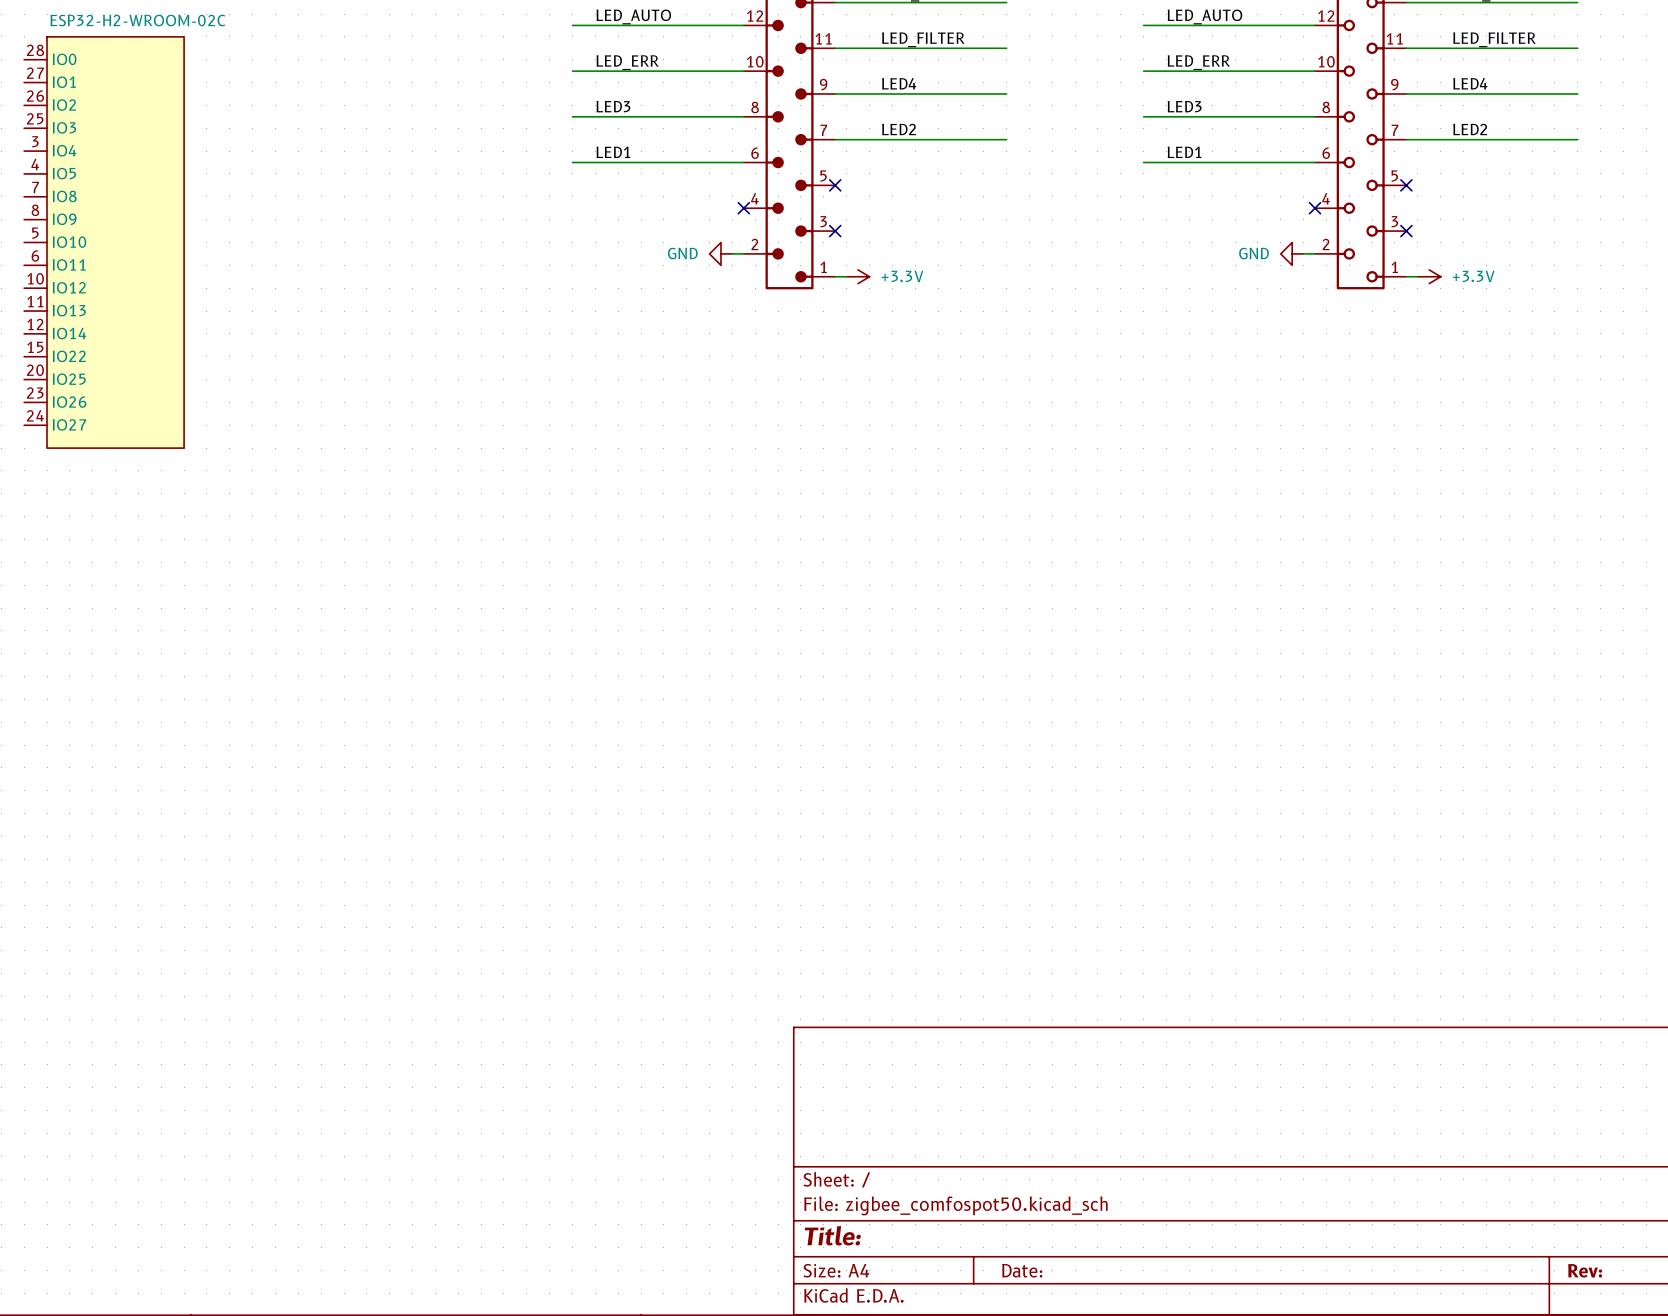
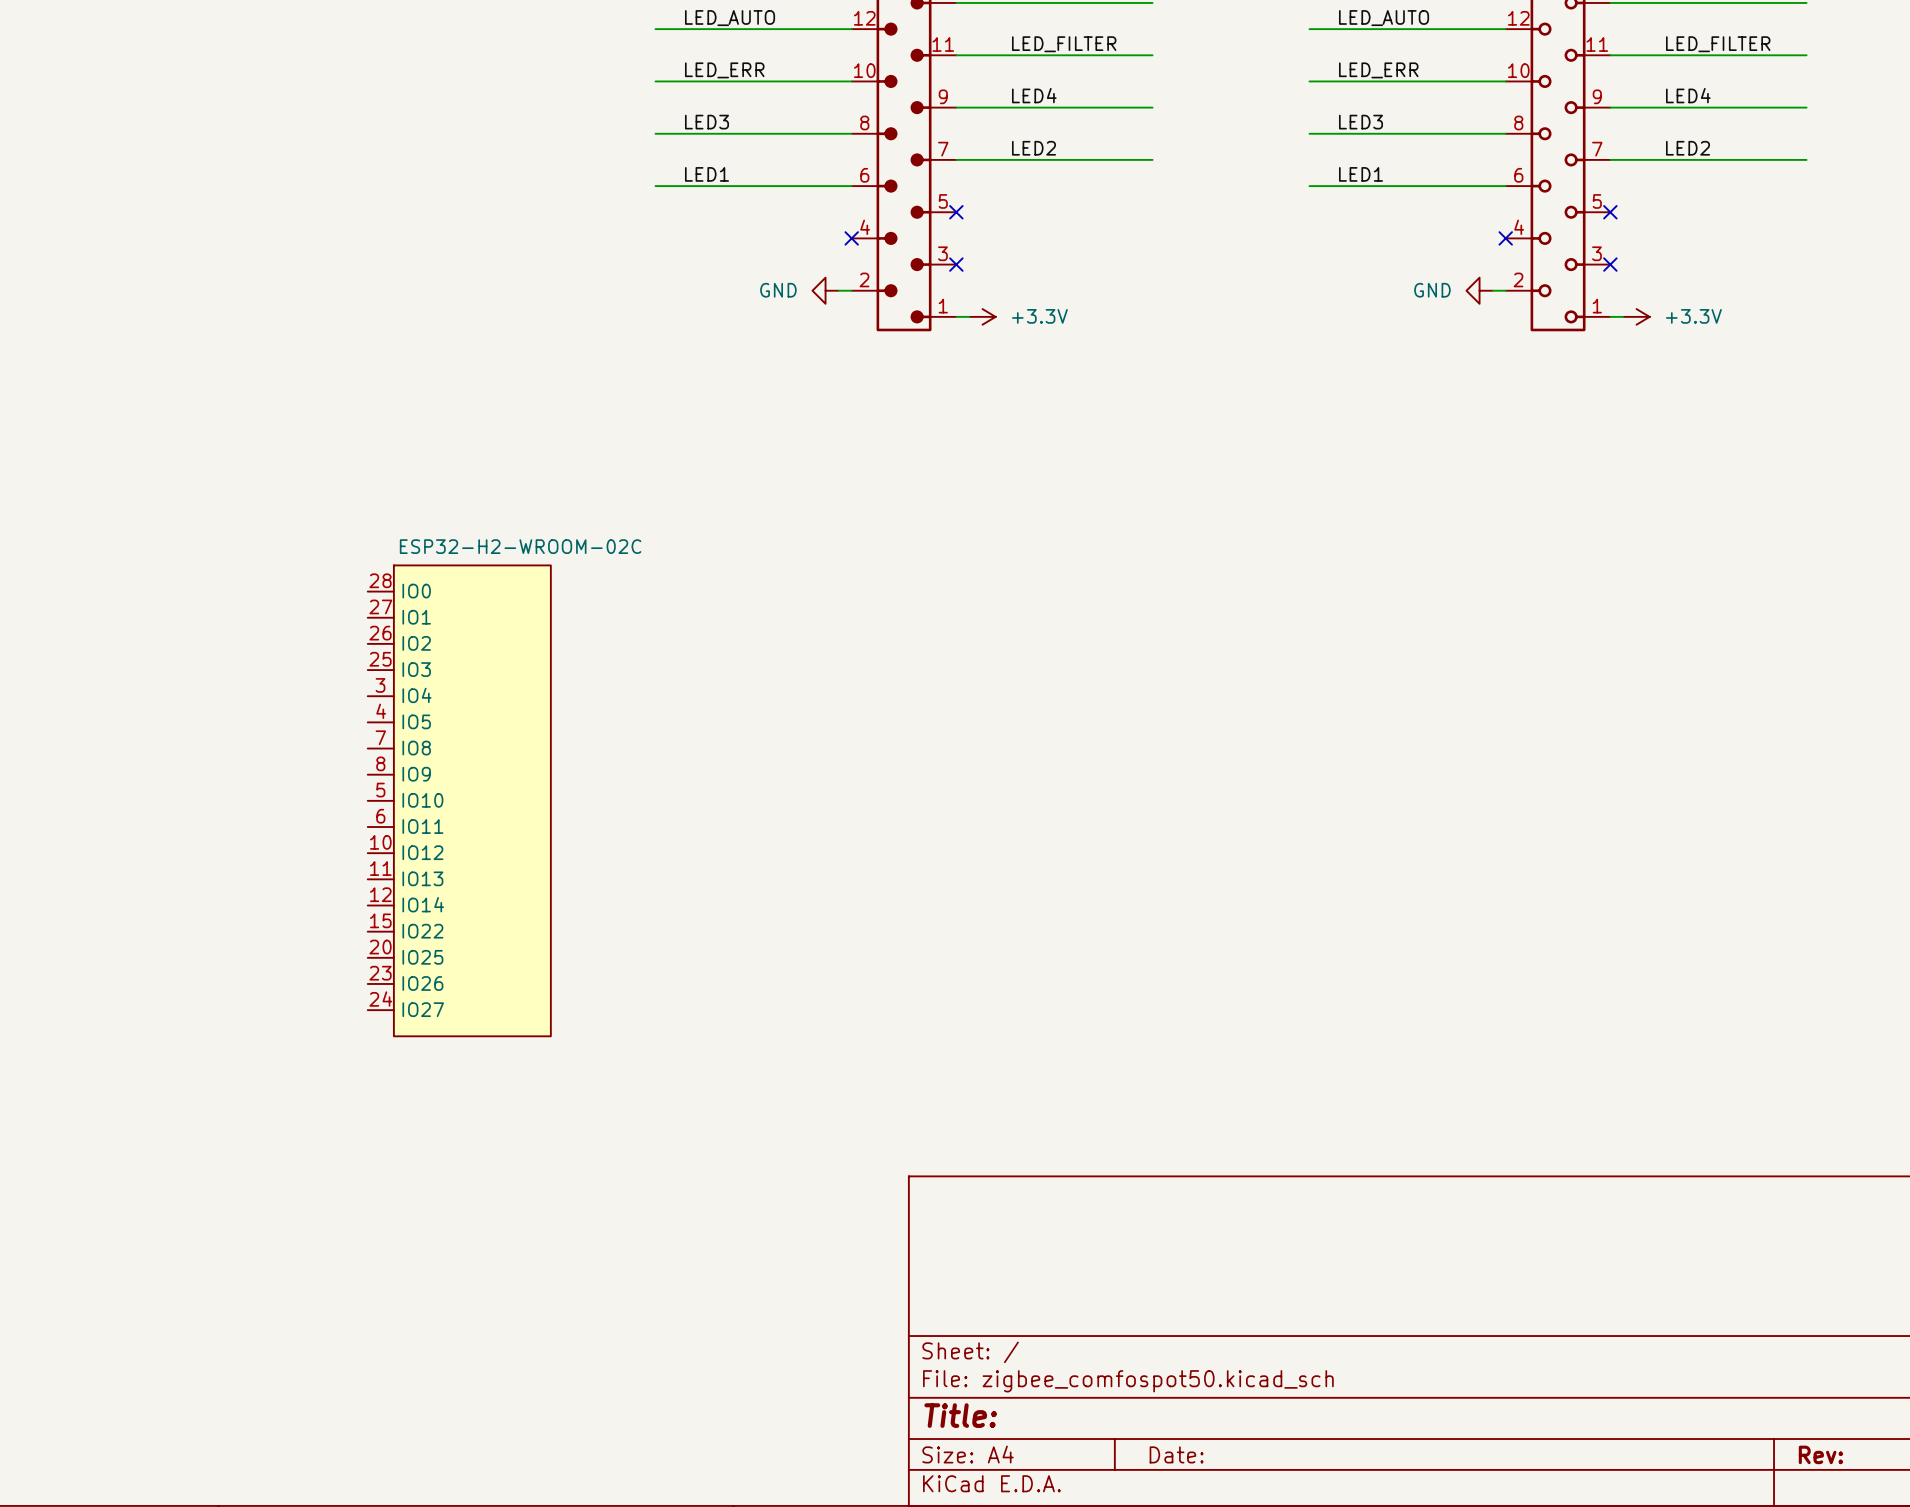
part: ESP32-H2-WROOM-02C (104, 242) -> none
part: none -> ESP32-H2-WROOM-02C (459, 800)

